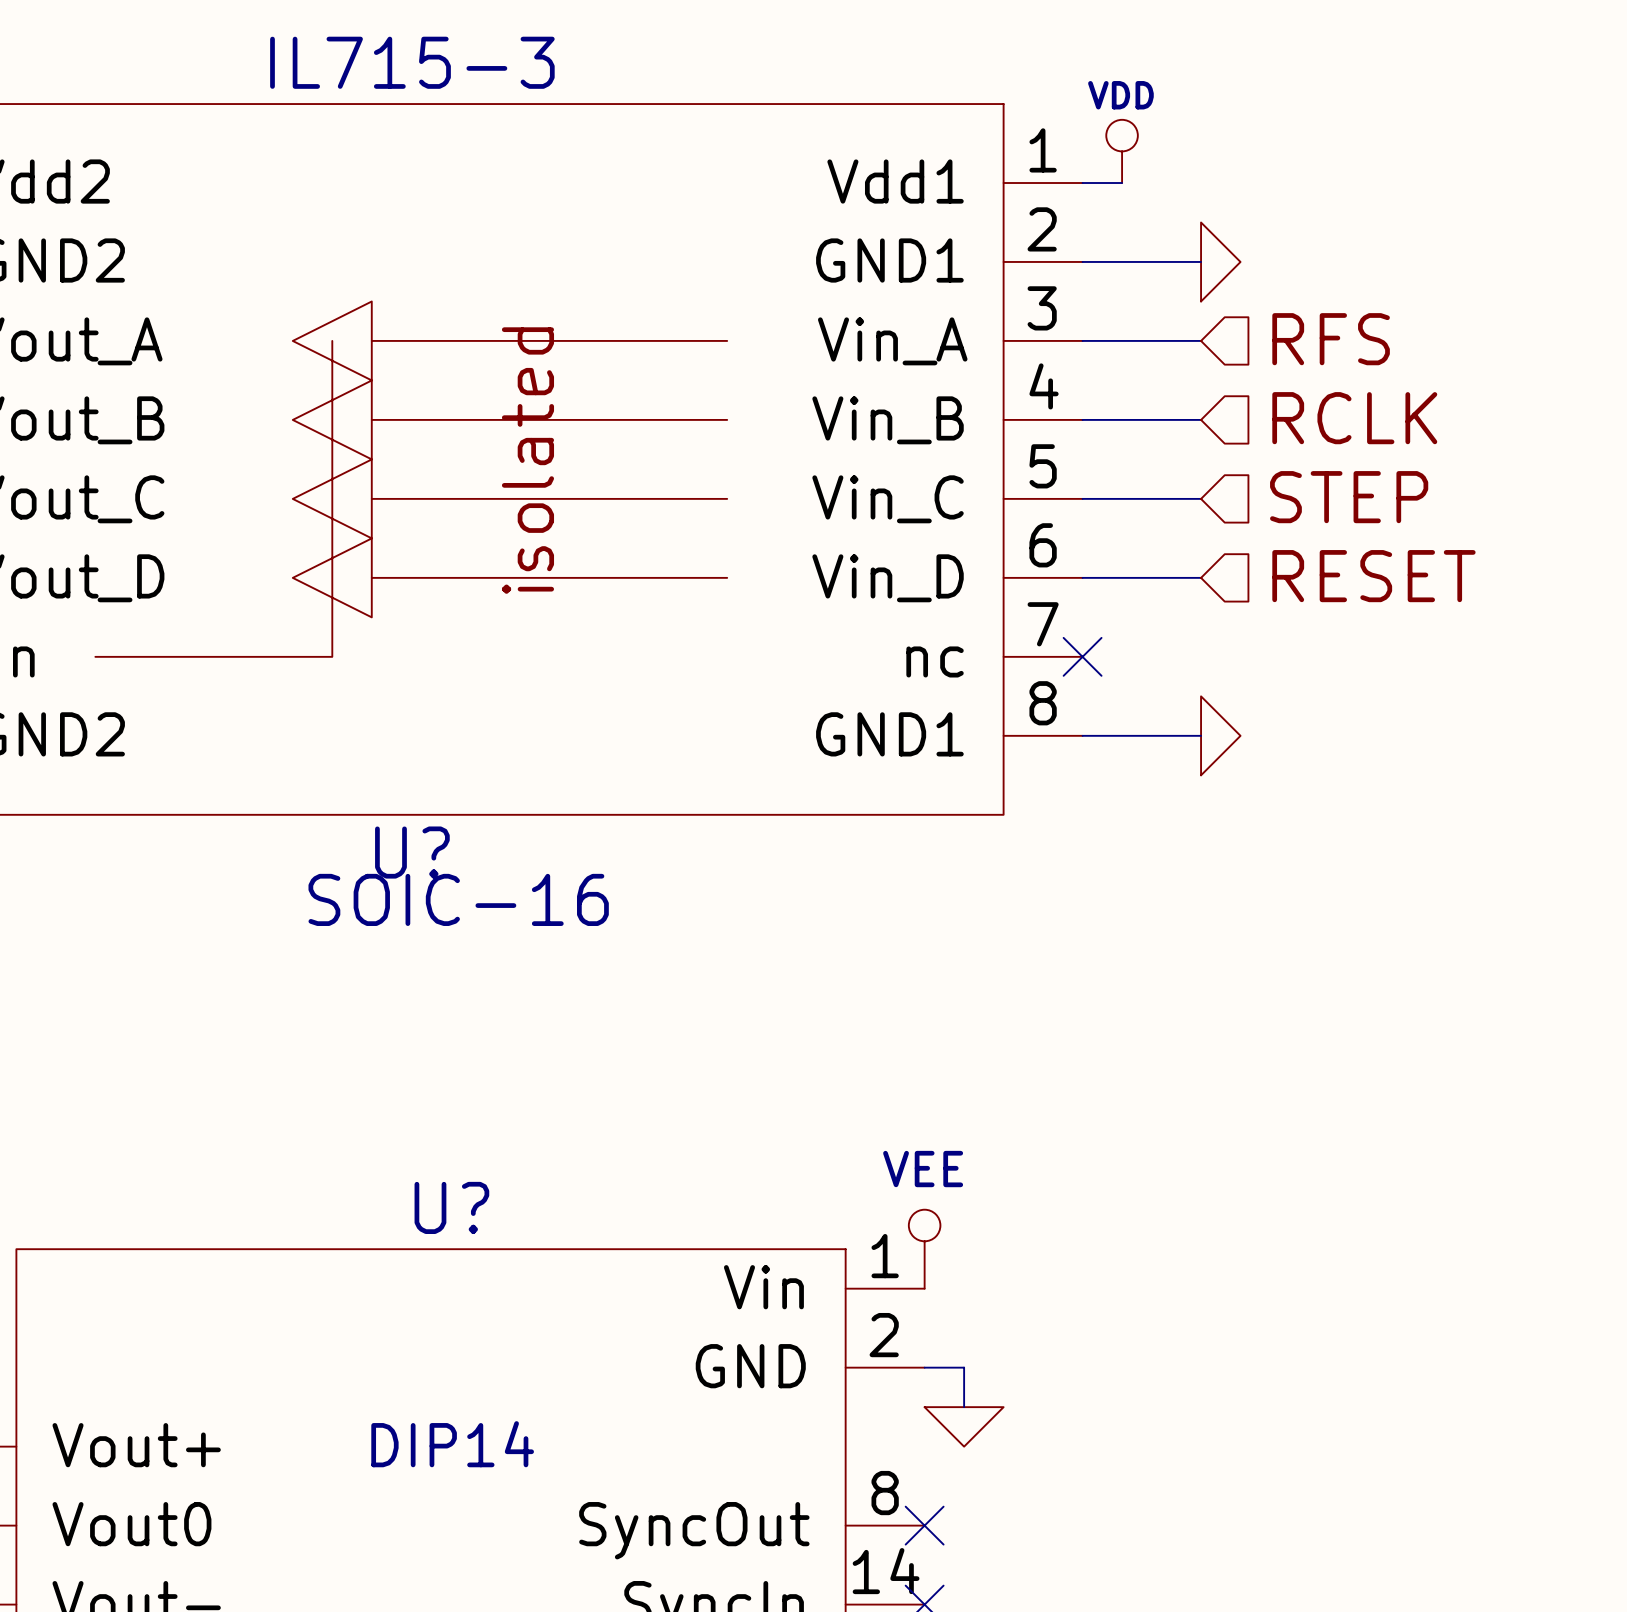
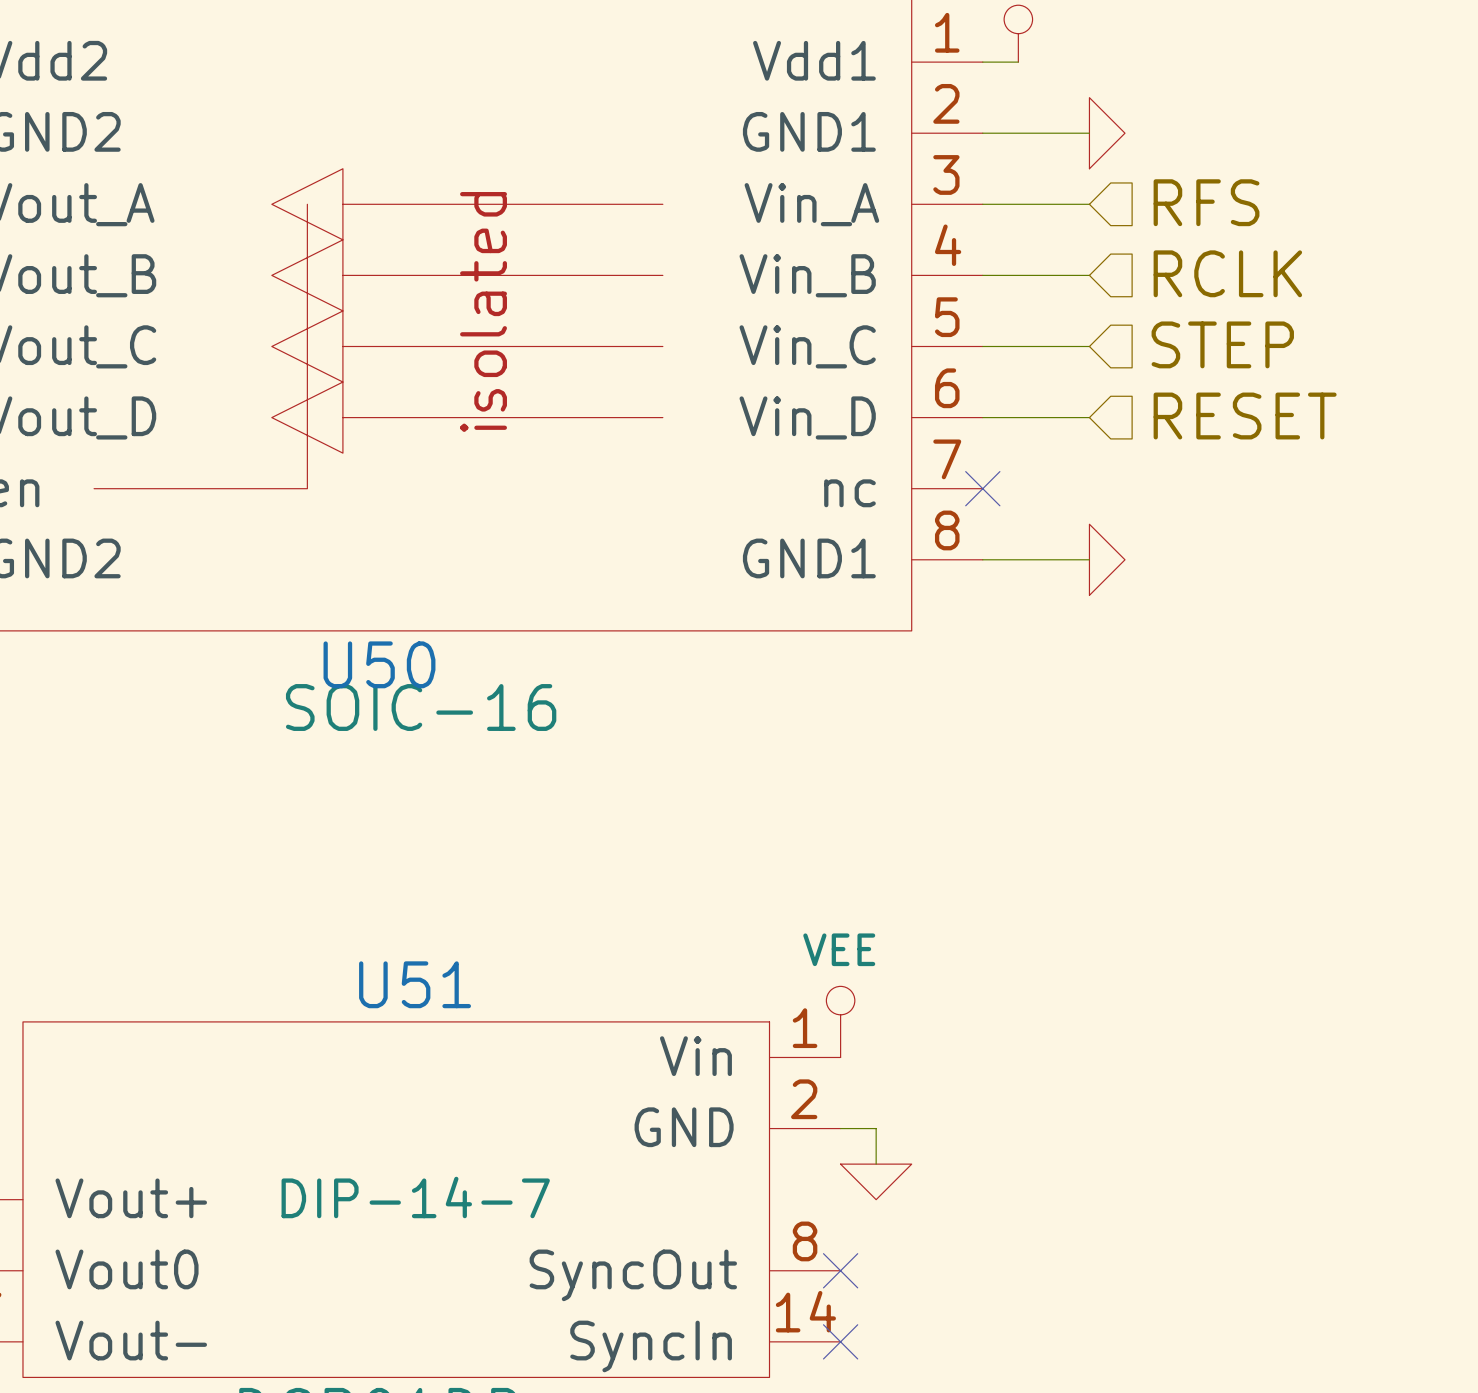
U? name: U? (412, 852) -> U50 (379, 664)
U? name: U? (451, 1207) -> U51 (415, 984)
U? text: DIP14 (452, 1444) -> DIP-14-7 (415, 1197)

